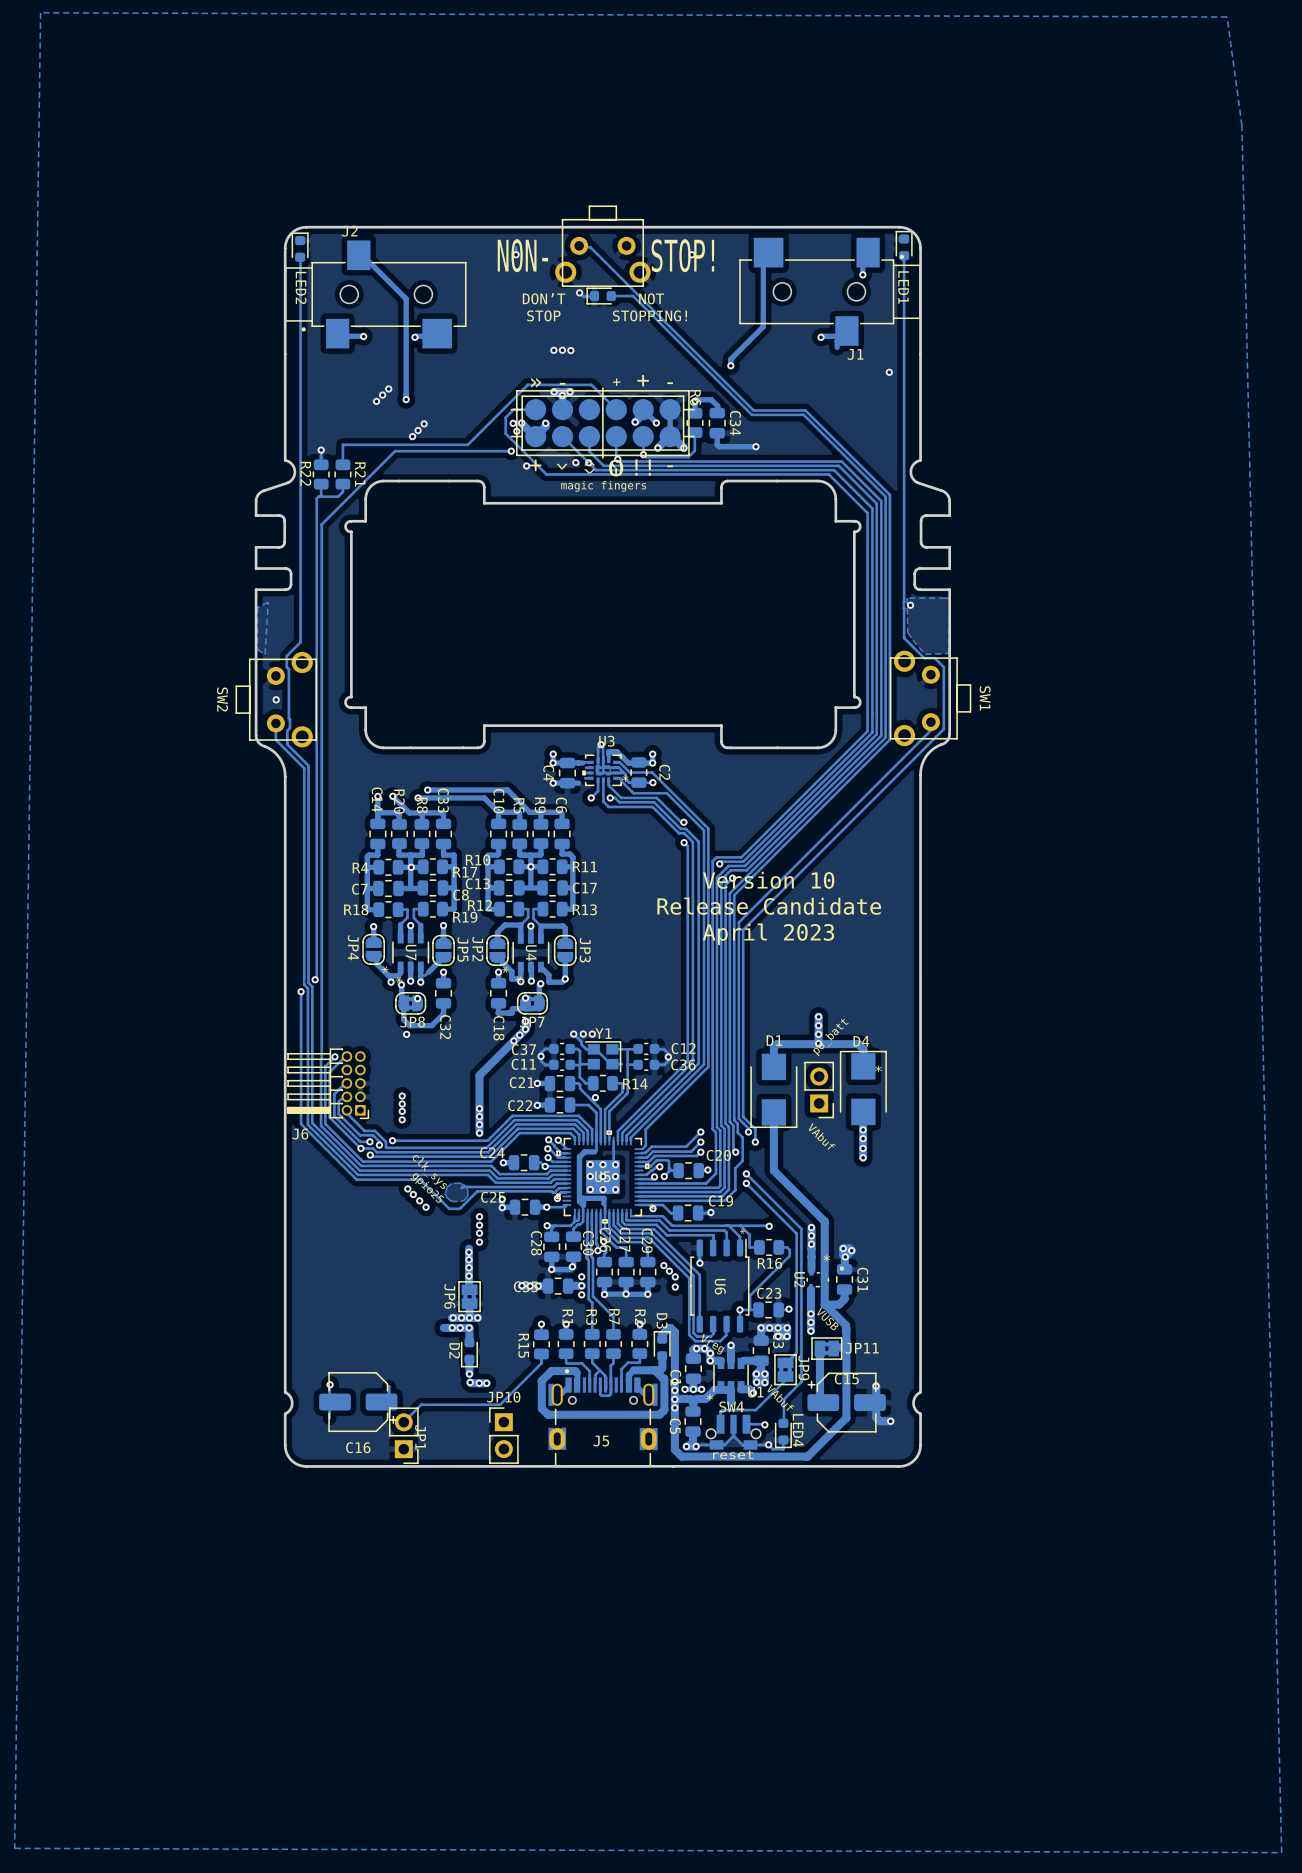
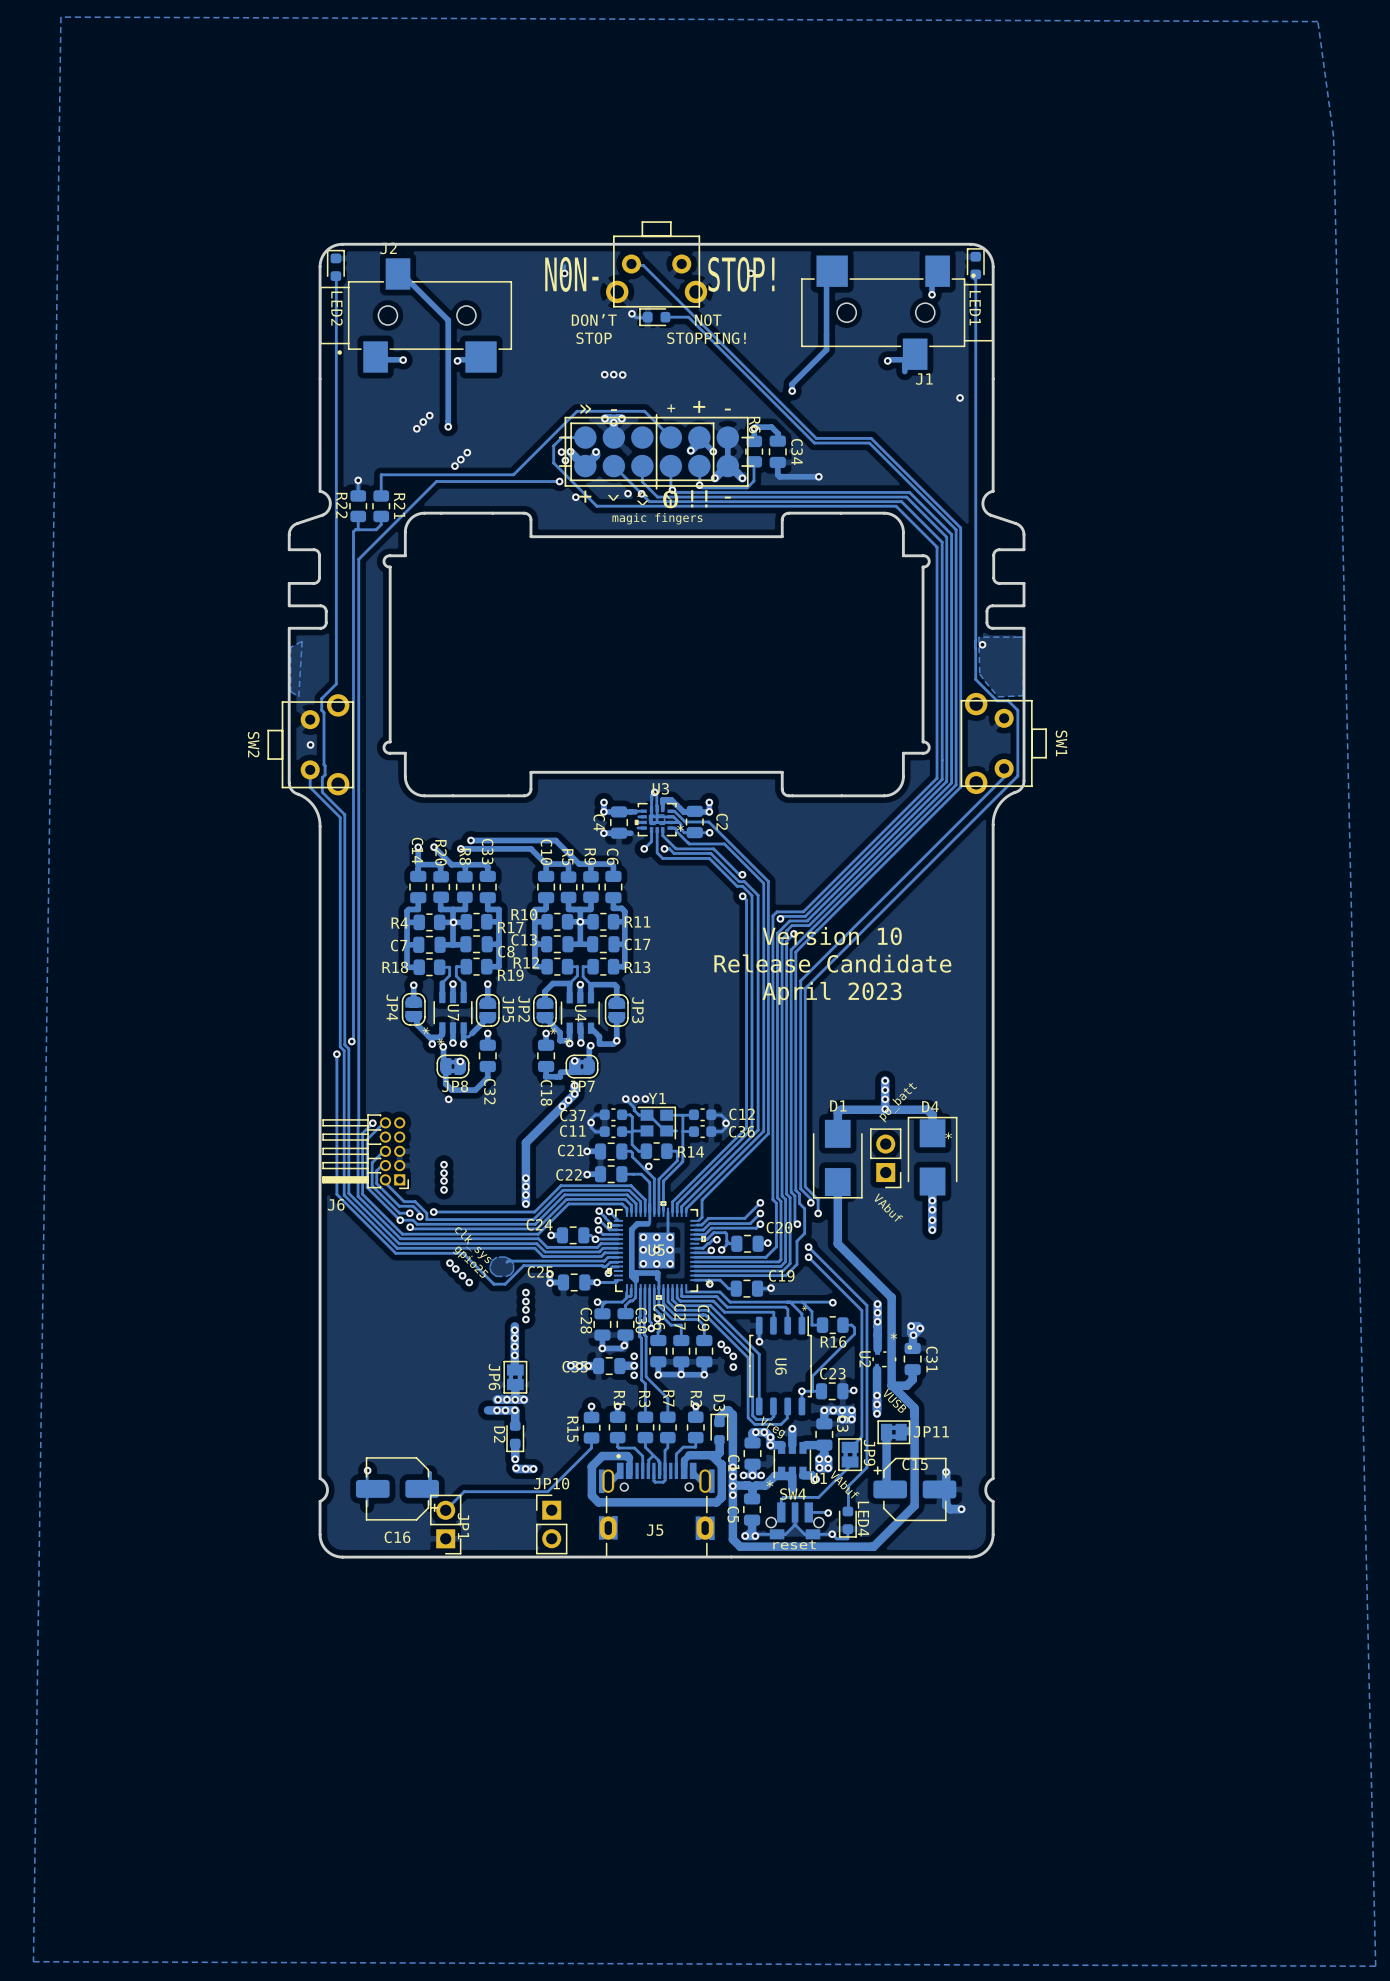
part footprint: [510, 387, 696, 459] -> [558, 413, 755, 490]

